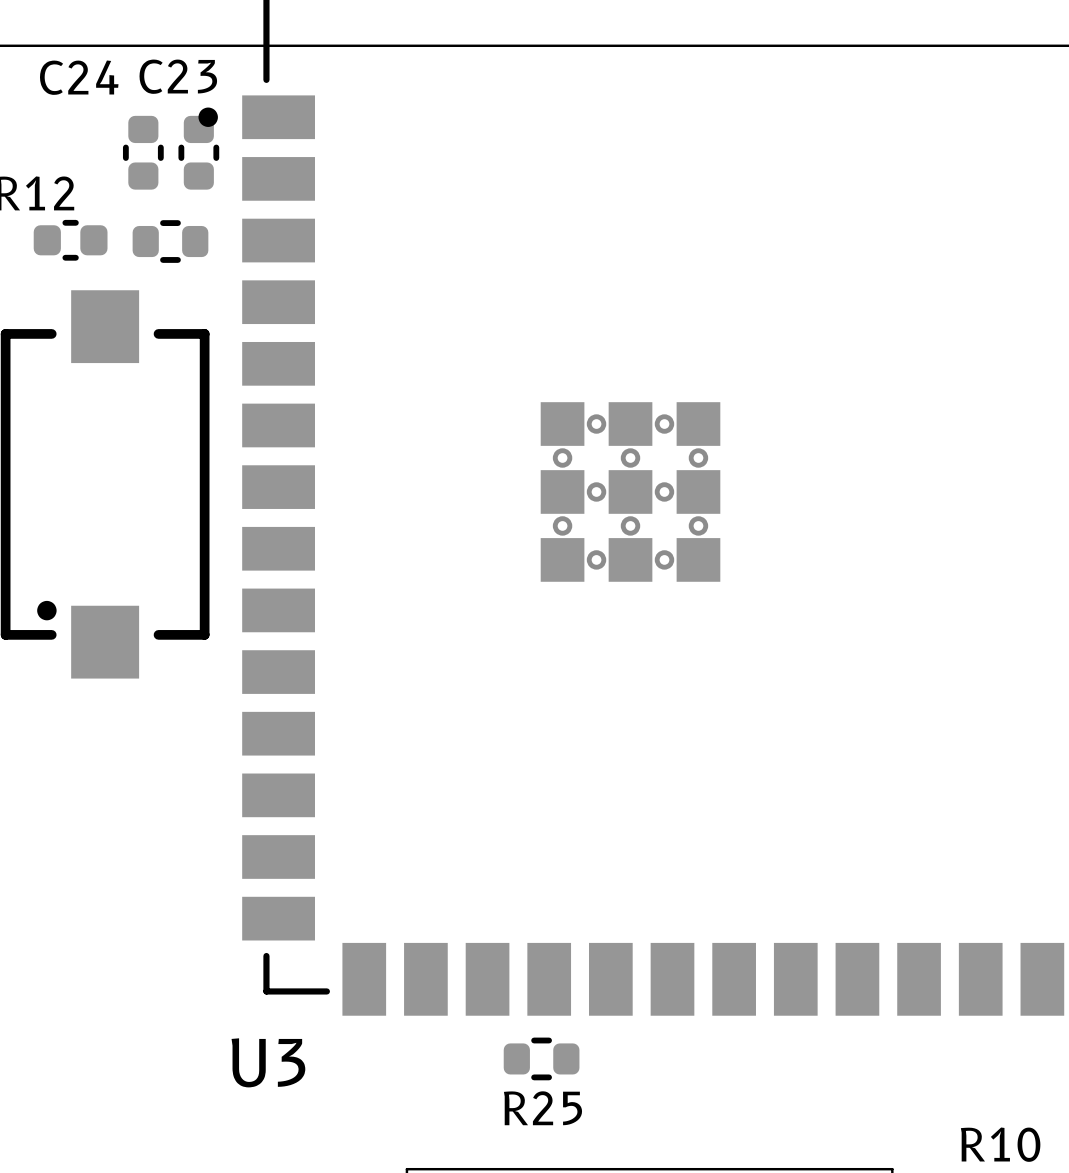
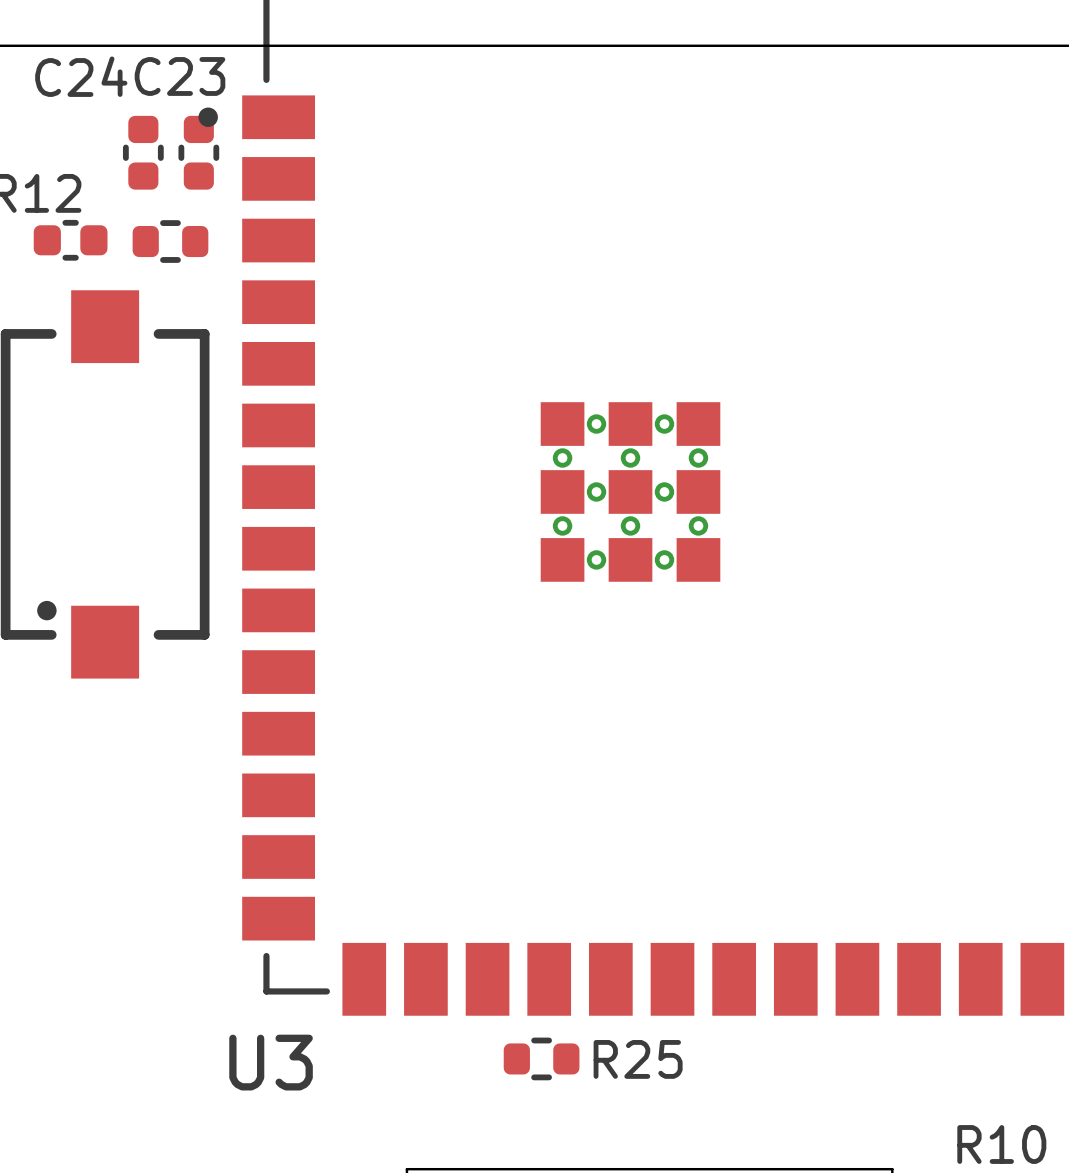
R25 name position: R25 (542, 1108) -> R25 (638, 1059)

